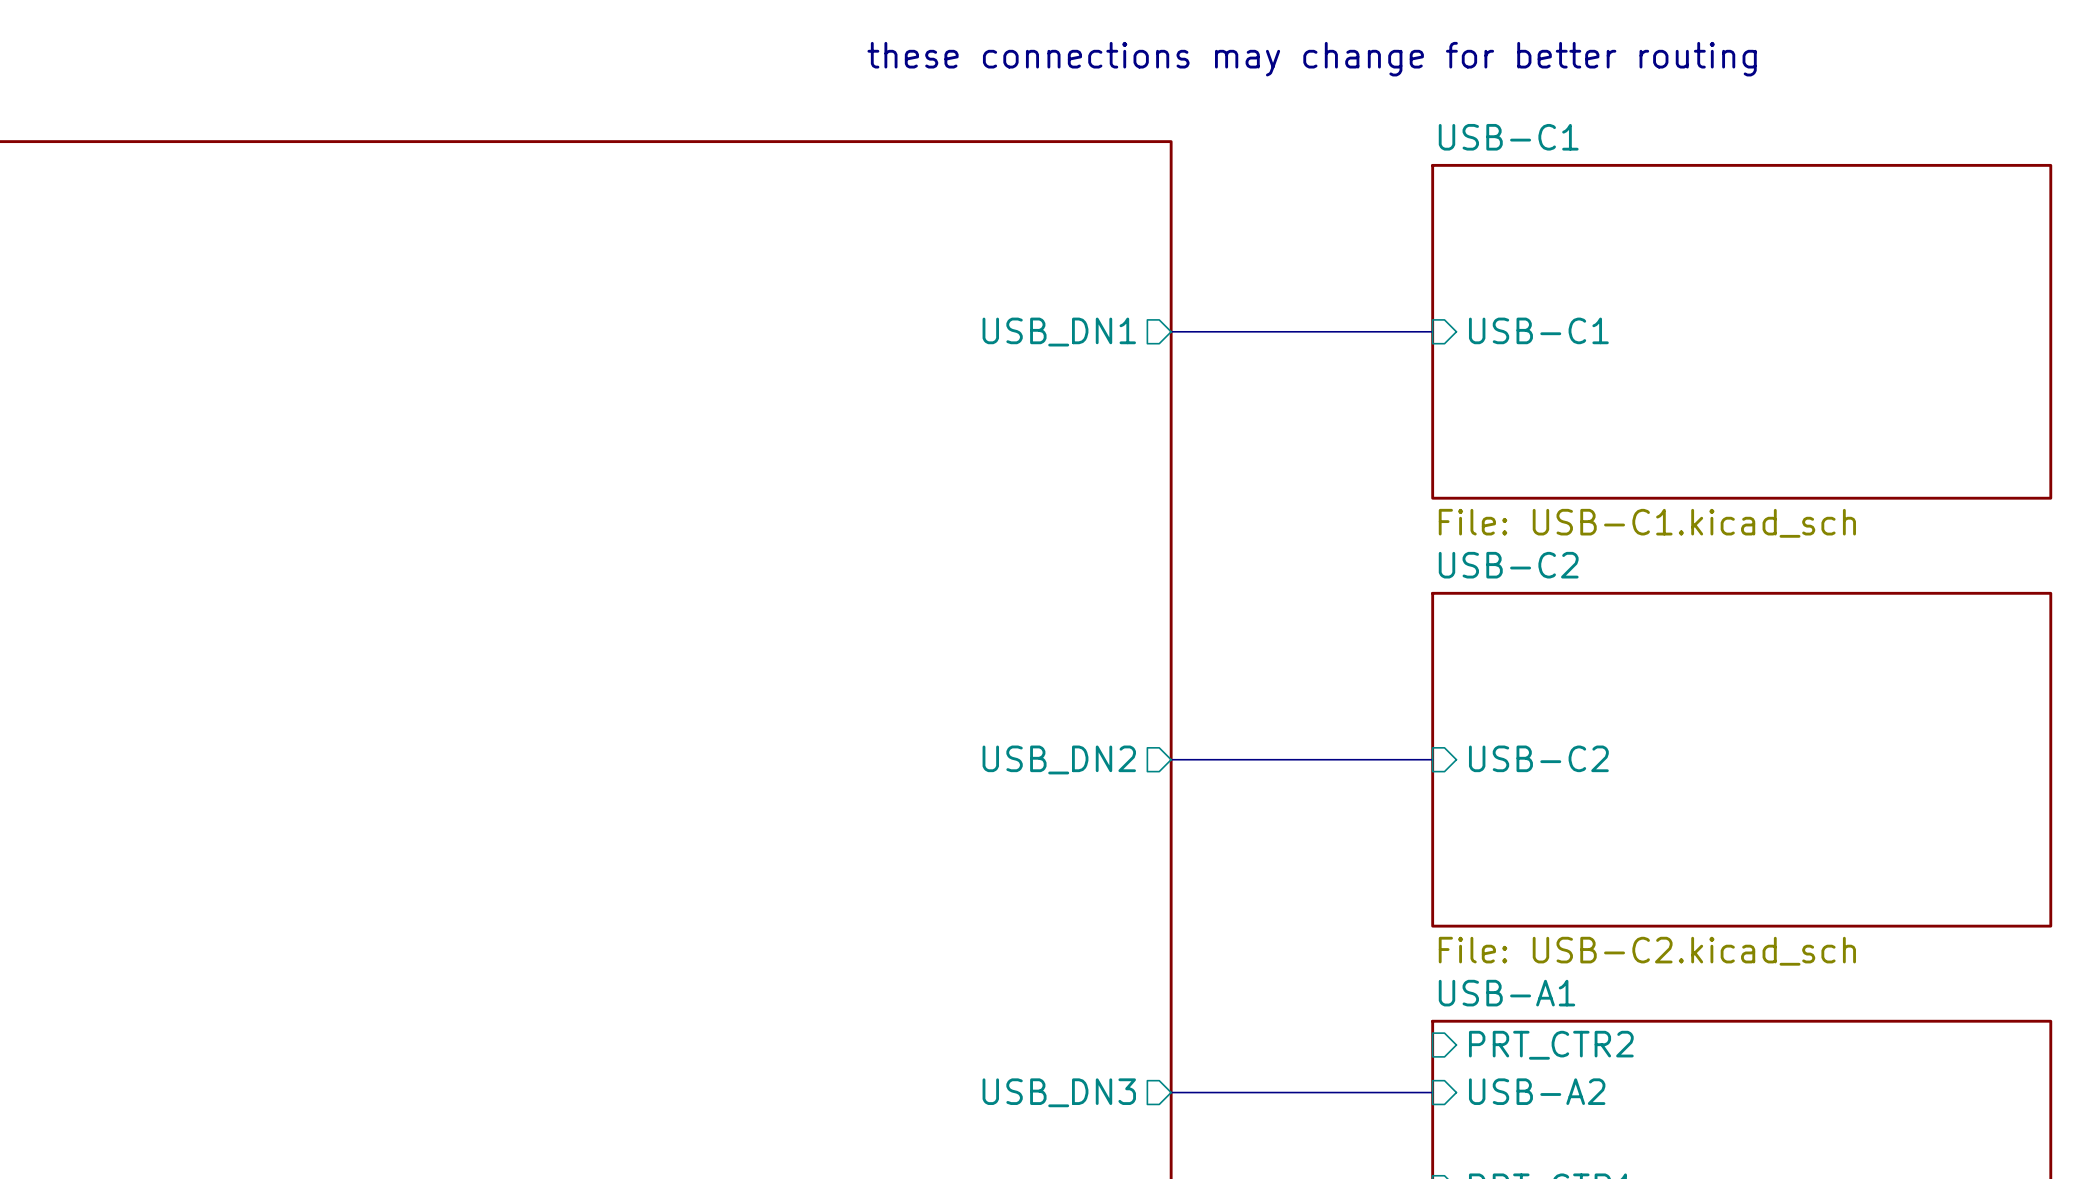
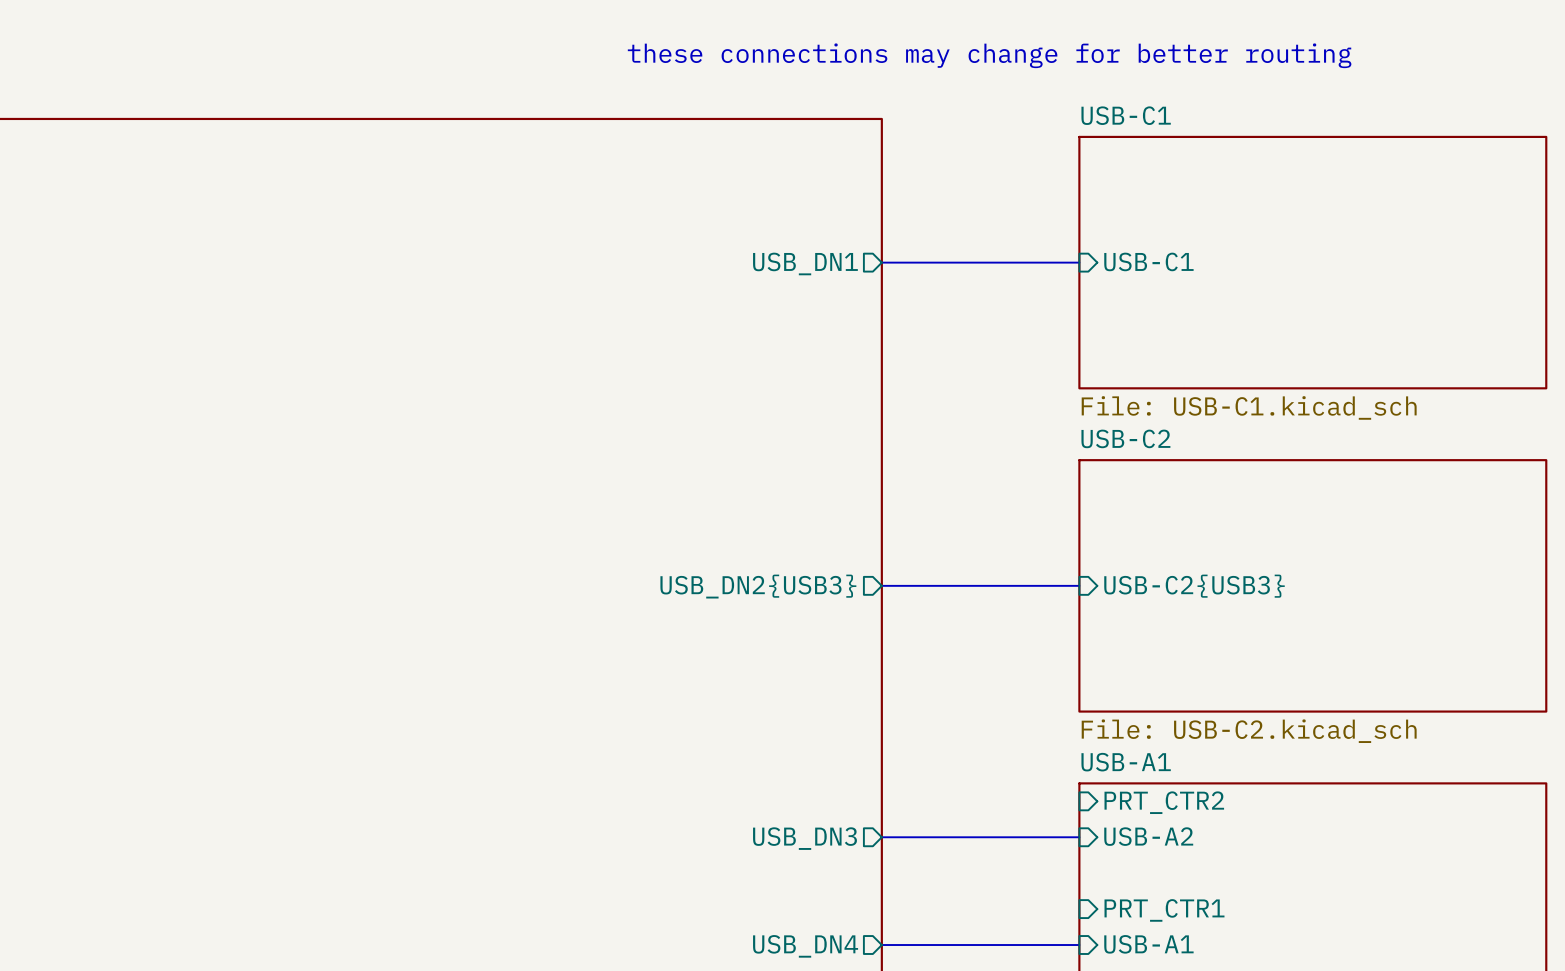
sheet pin: USB-C2 (1538, 758) -> USB-C2{USB3} (1194, 586)
sheet pin: USB_DN2 (1059, 759) -> USB_DN2{USB3} (758, 586)

